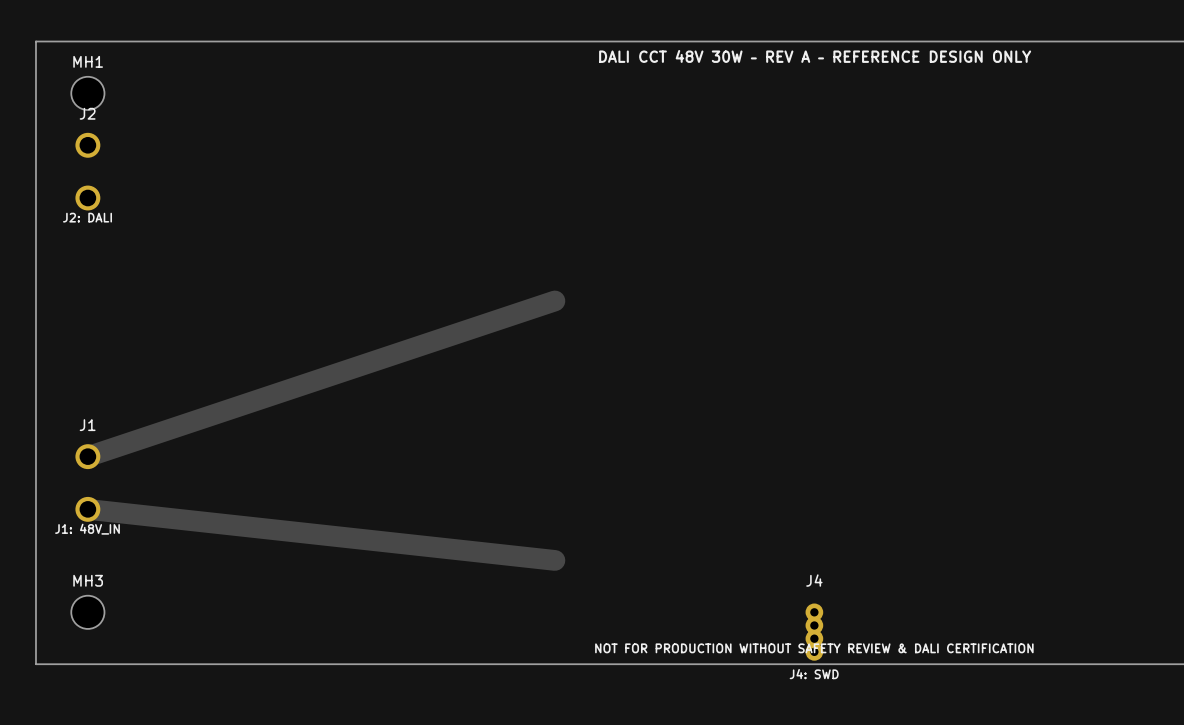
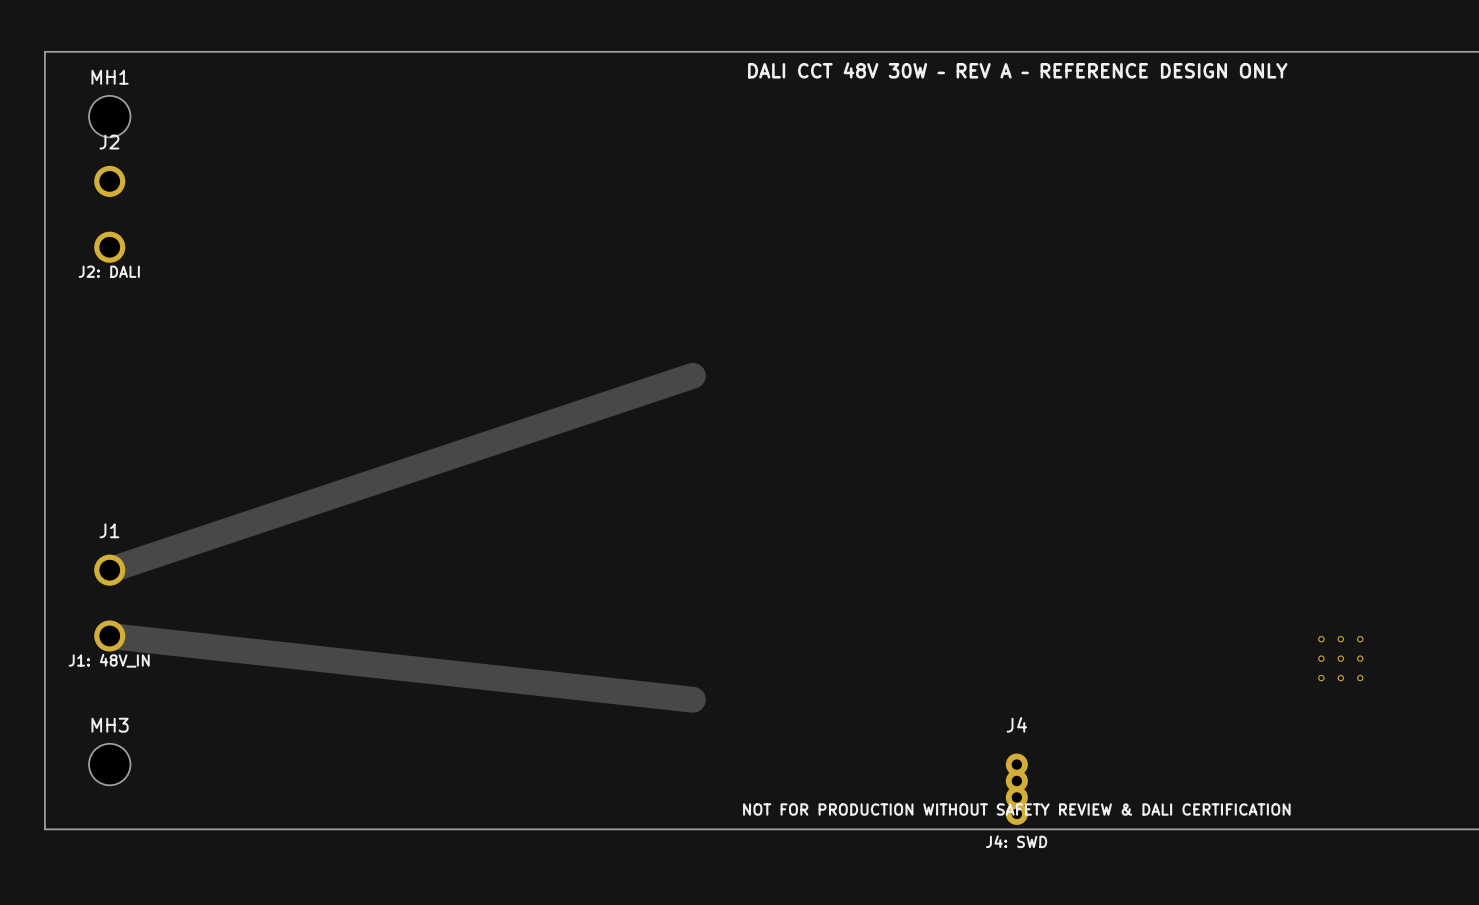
via: none -> (1321, 639)
via: none -> (1340, 639)
via: none -> (1360, 639)
via: none -> (1321, 658)
via: none -> (1340, 658)
via: none -> (1360, 658)
via: none -> (1321, 678)
via: none -> (1340, 678)
via: none -> (1360, 678)

